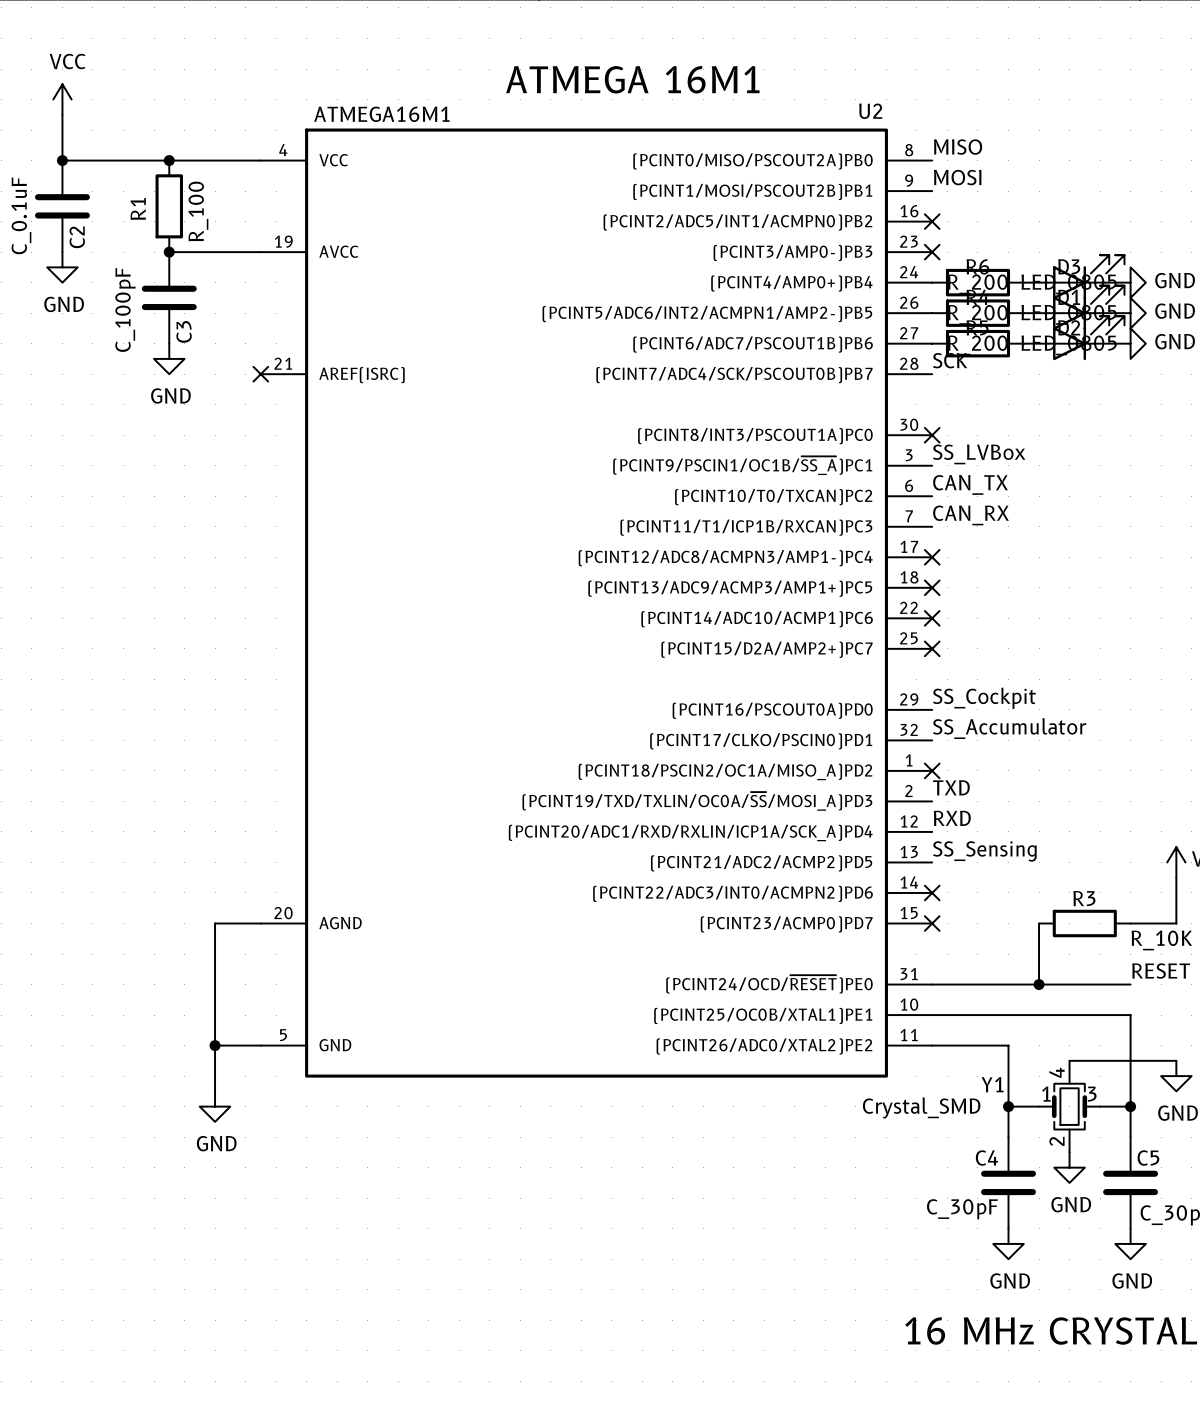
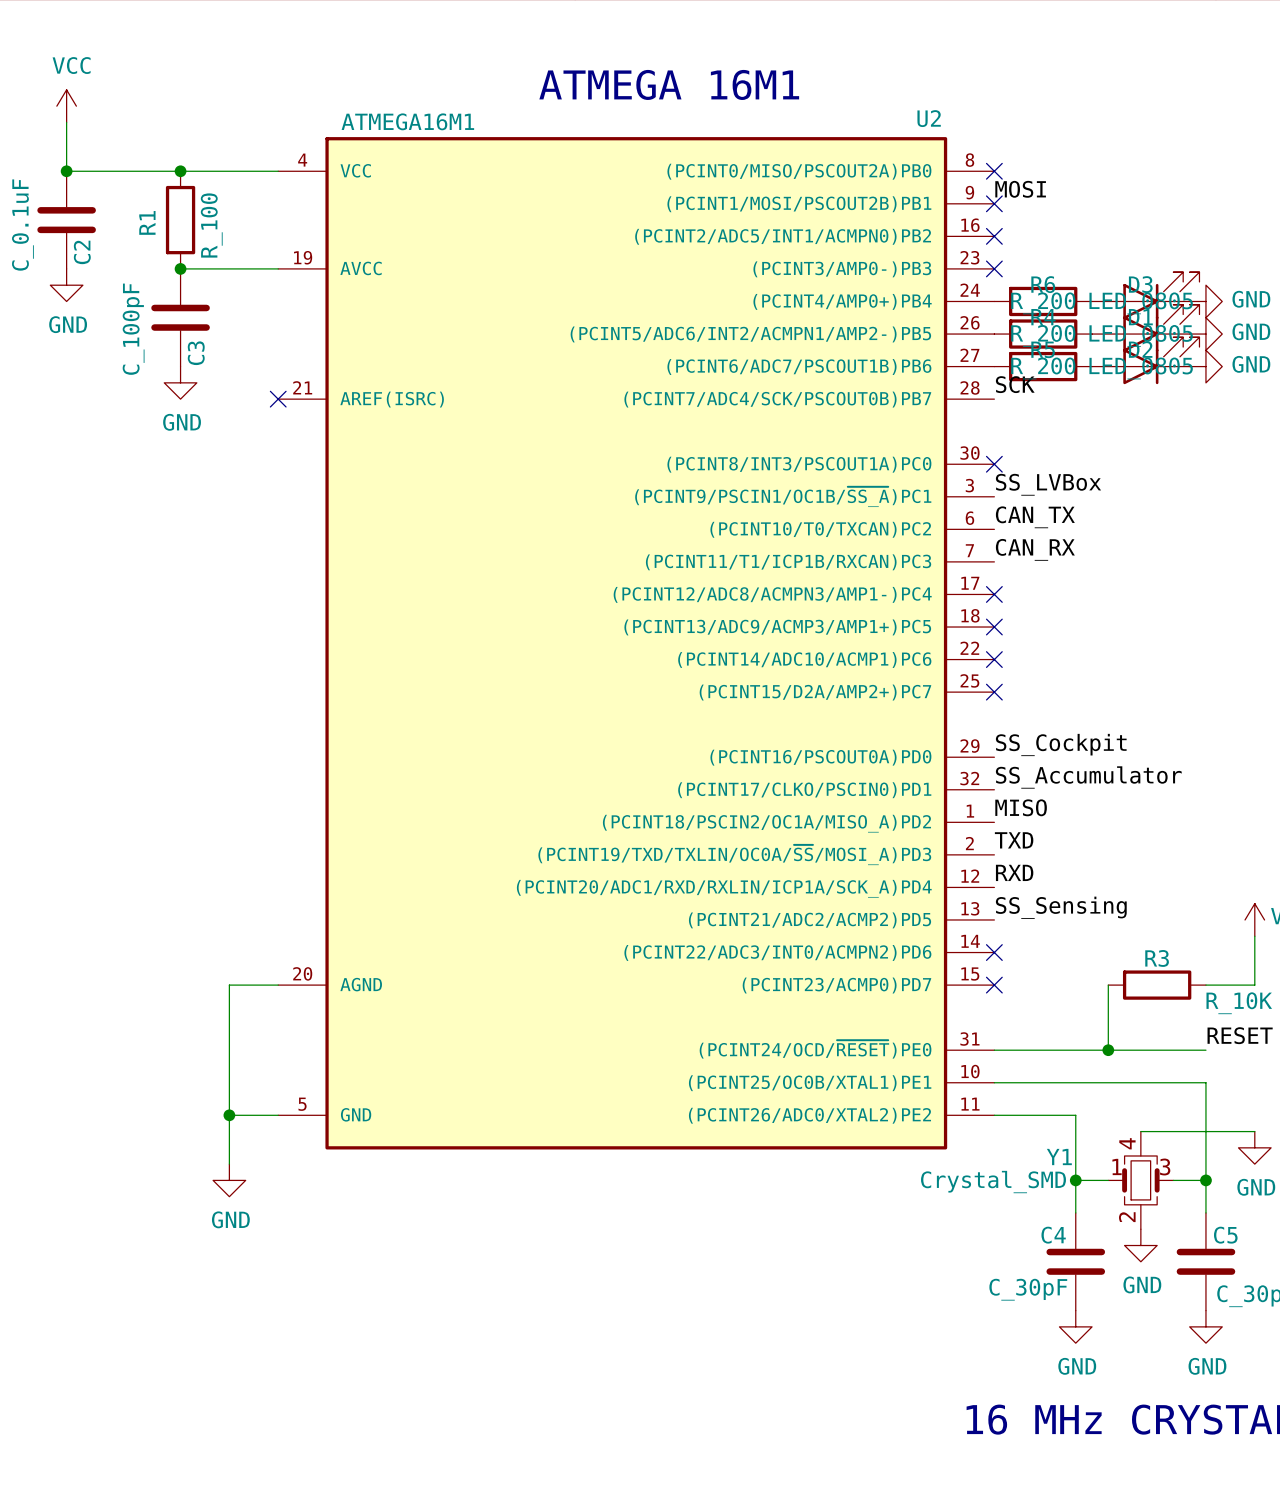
label: MISO (958, 147) -> none
no-connect mark: none -> (994, 171)
no-connect mark: none -> (994, 203)
label: none -> MISO (1021, 807)
no-connect mark: (932, 770) -> none

